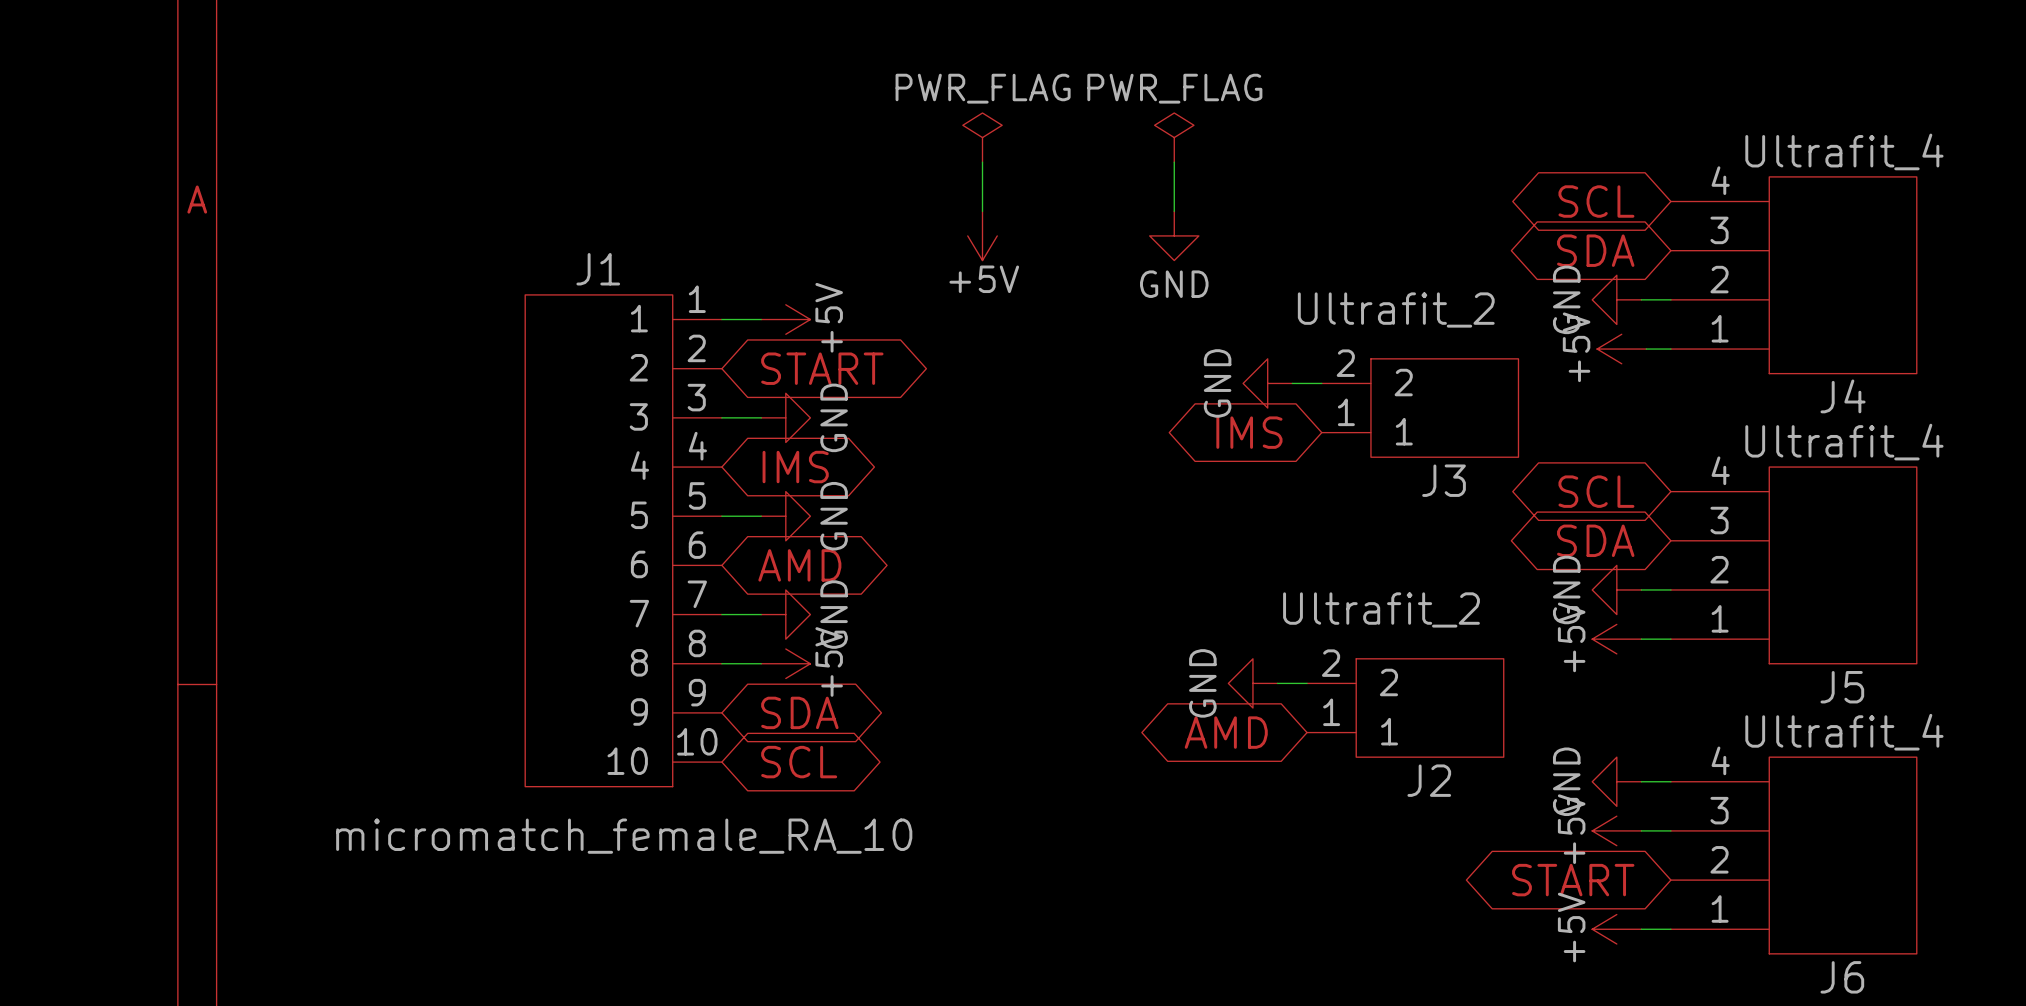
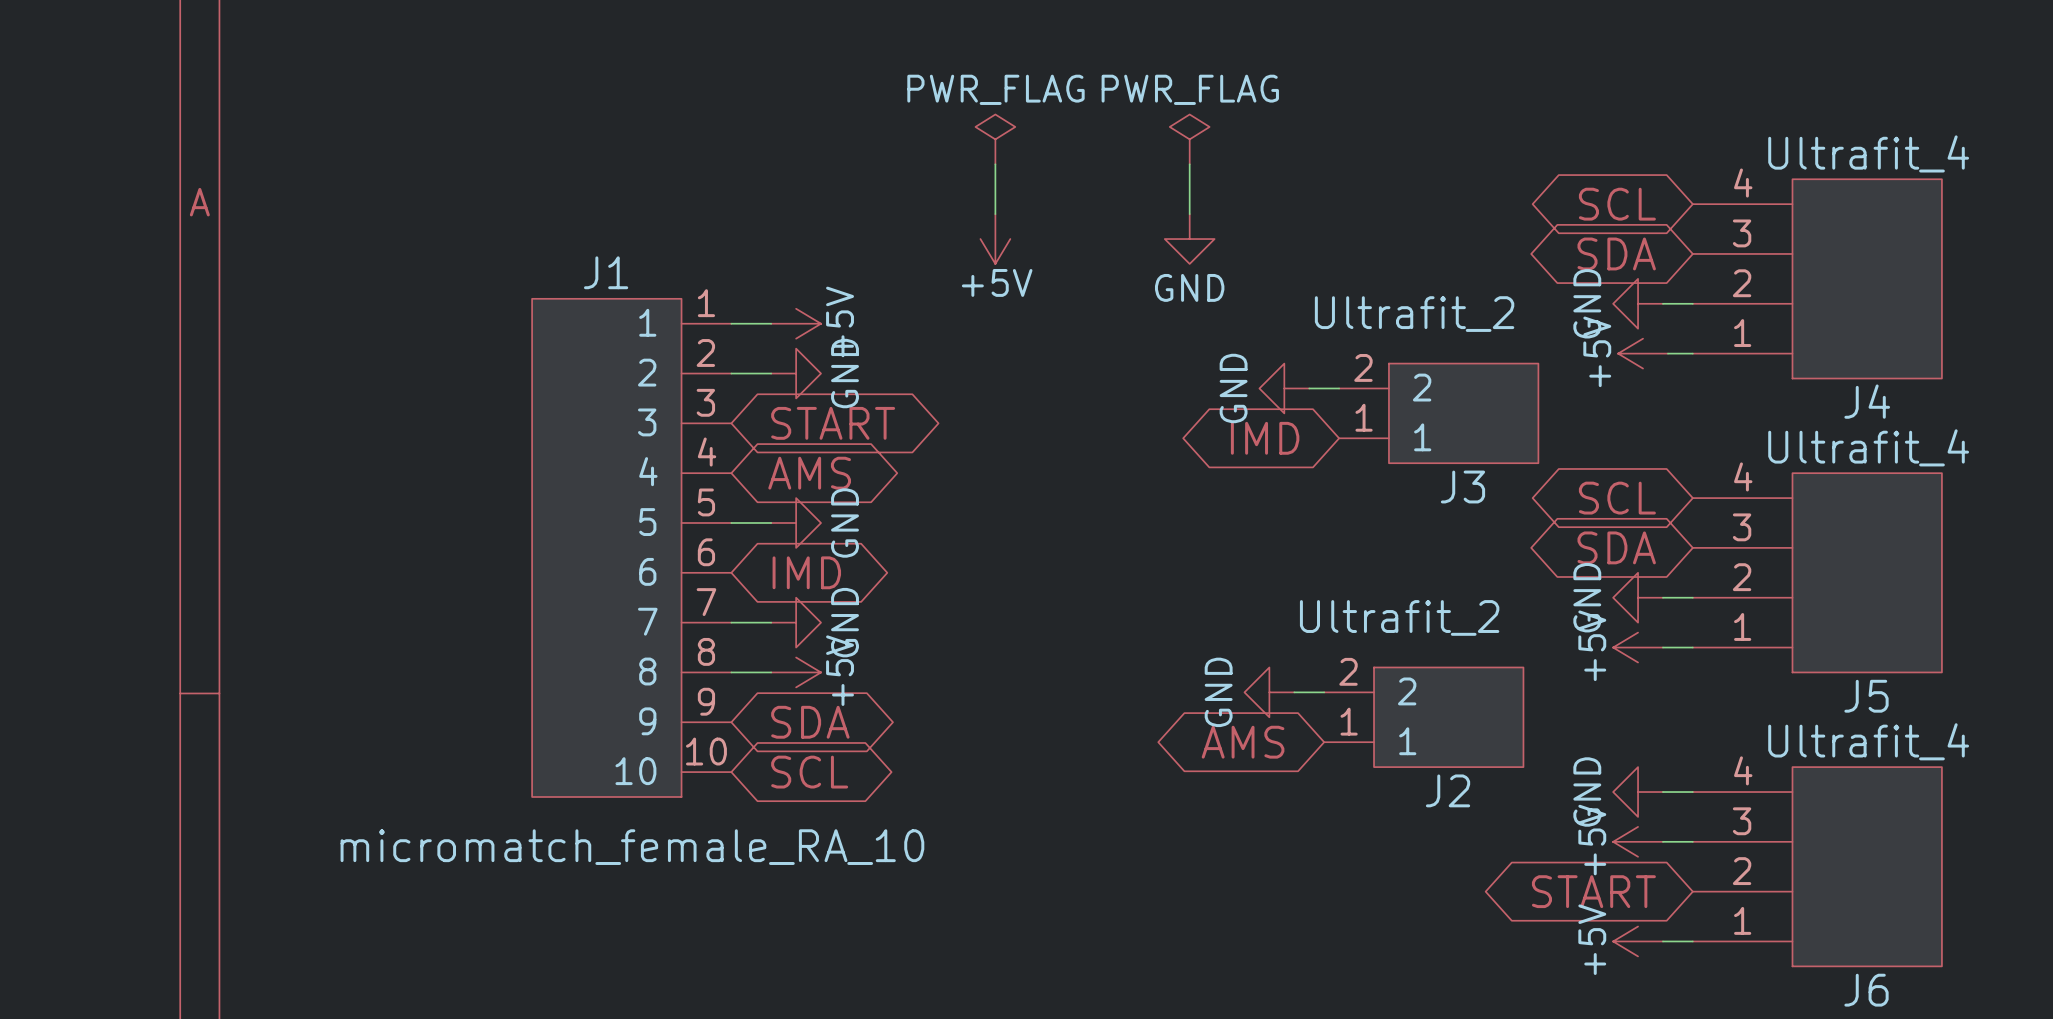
global label position: START (822, 368) -> START (833, 423)
wire: (721, 417) (761, 417) -> (731, 373) (771, 373)
power symbol position: GND (785, 417) -> GND (796, 373)
global label: IMS (1249, 432) -> IMD (1265, 438)
global label: IMS (795, 467) -> AMS (809, 473)
global label: AMD (799, 565) -> IMD (806, 572)
global label: AMD (1226, 732) -> AMS (1243, 742)

